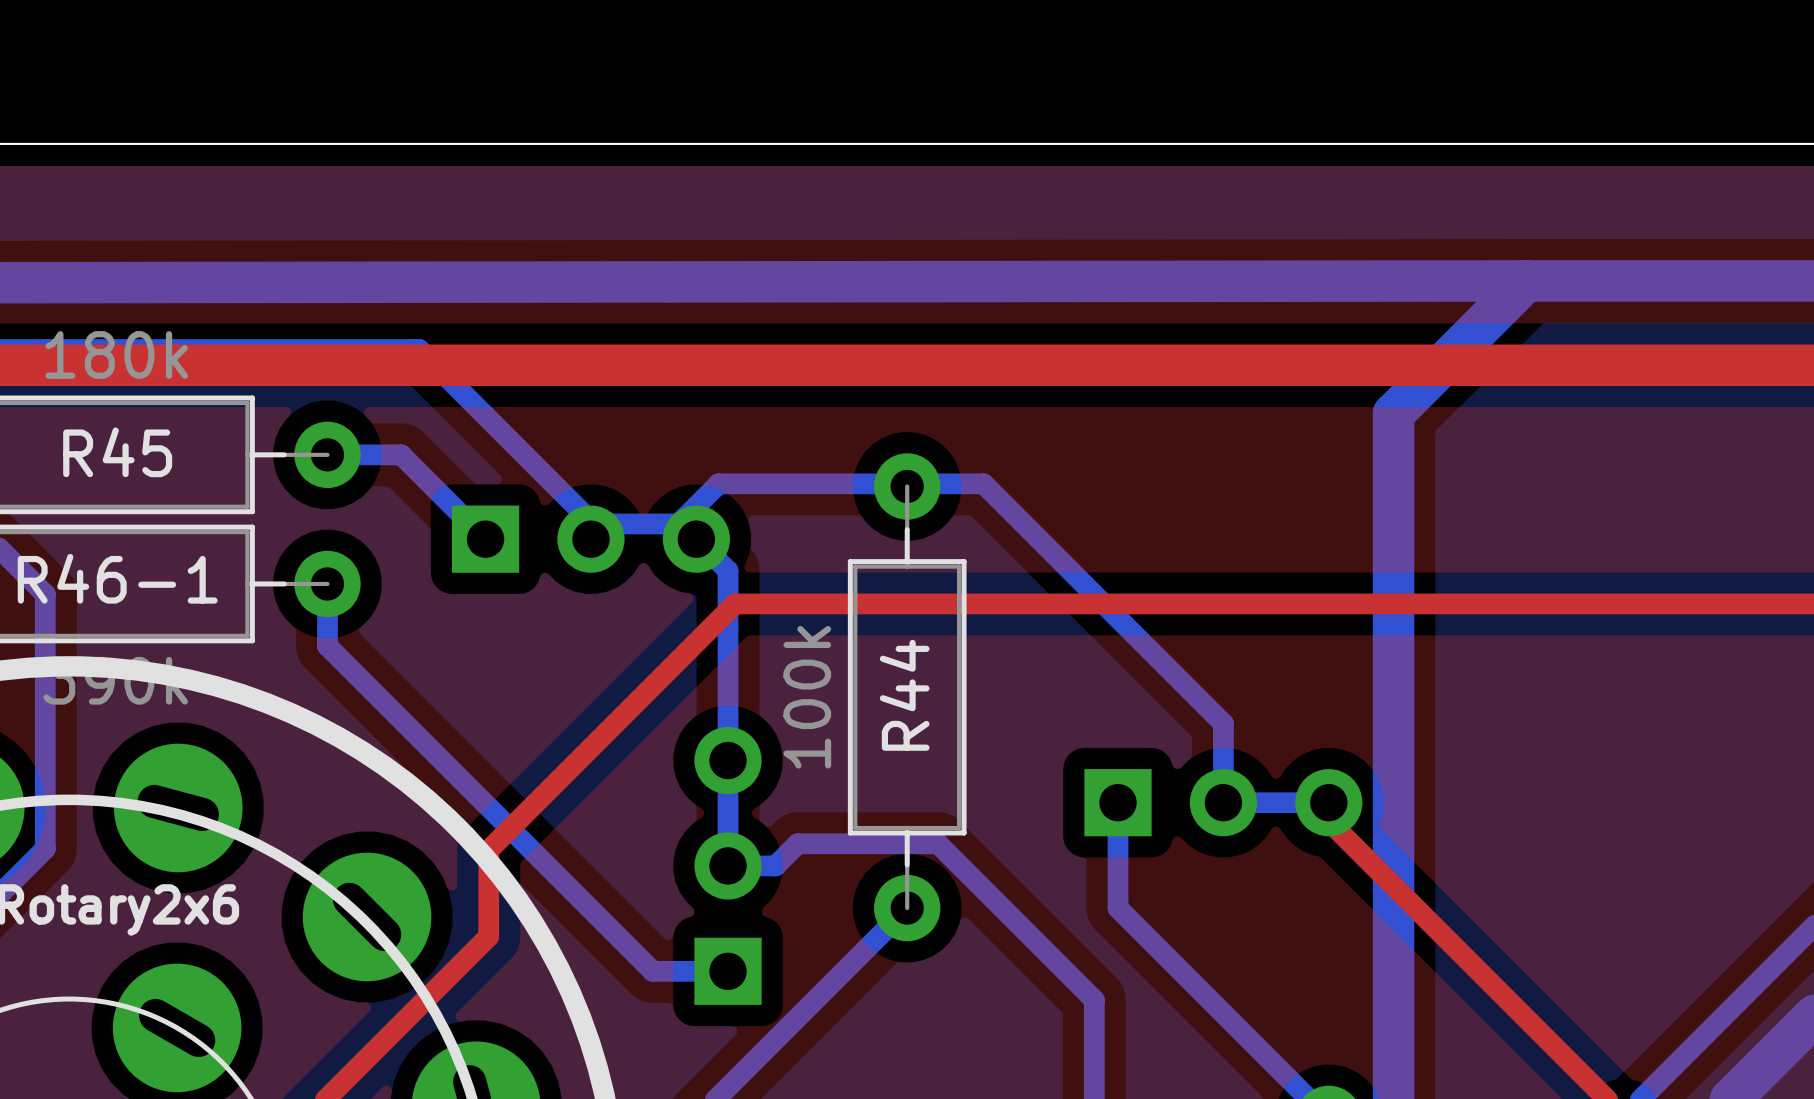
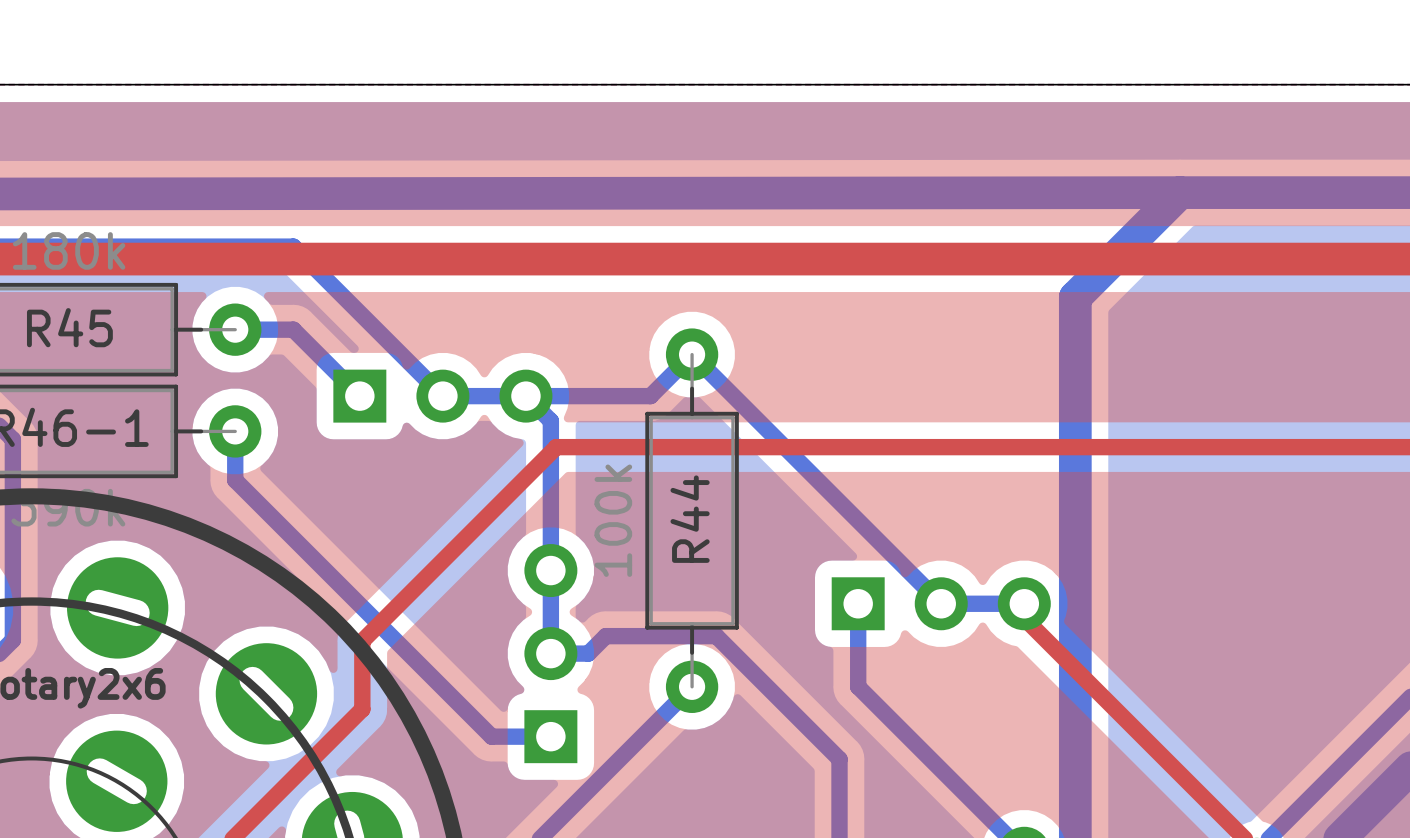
bottom track: (401, 349) (419, 349) (593, 523) (678, 523) (718, 483) (983, 483) (1223, 723) (1223, 802) -> (293, 246) (442, 396) (650, 396) (692, 354) (941, 603)

